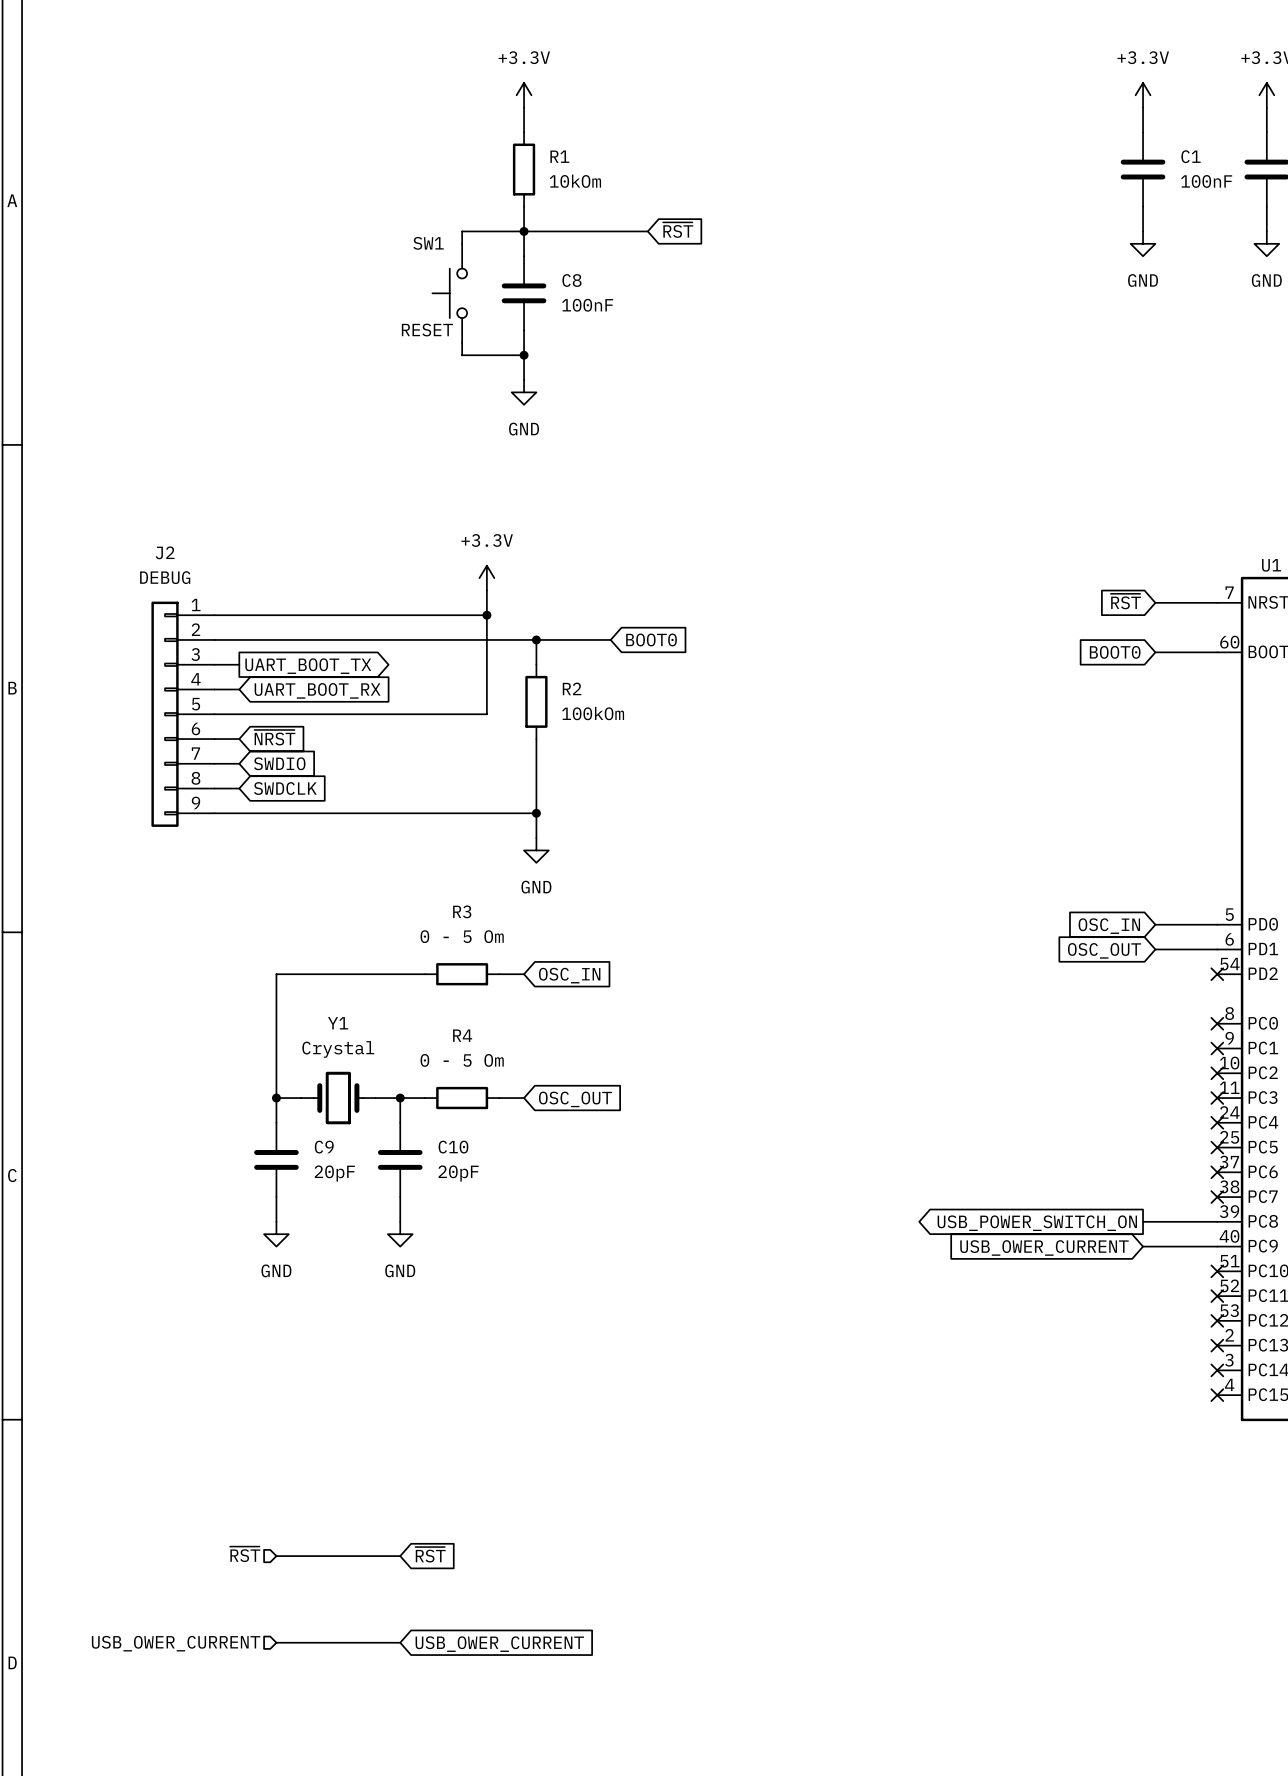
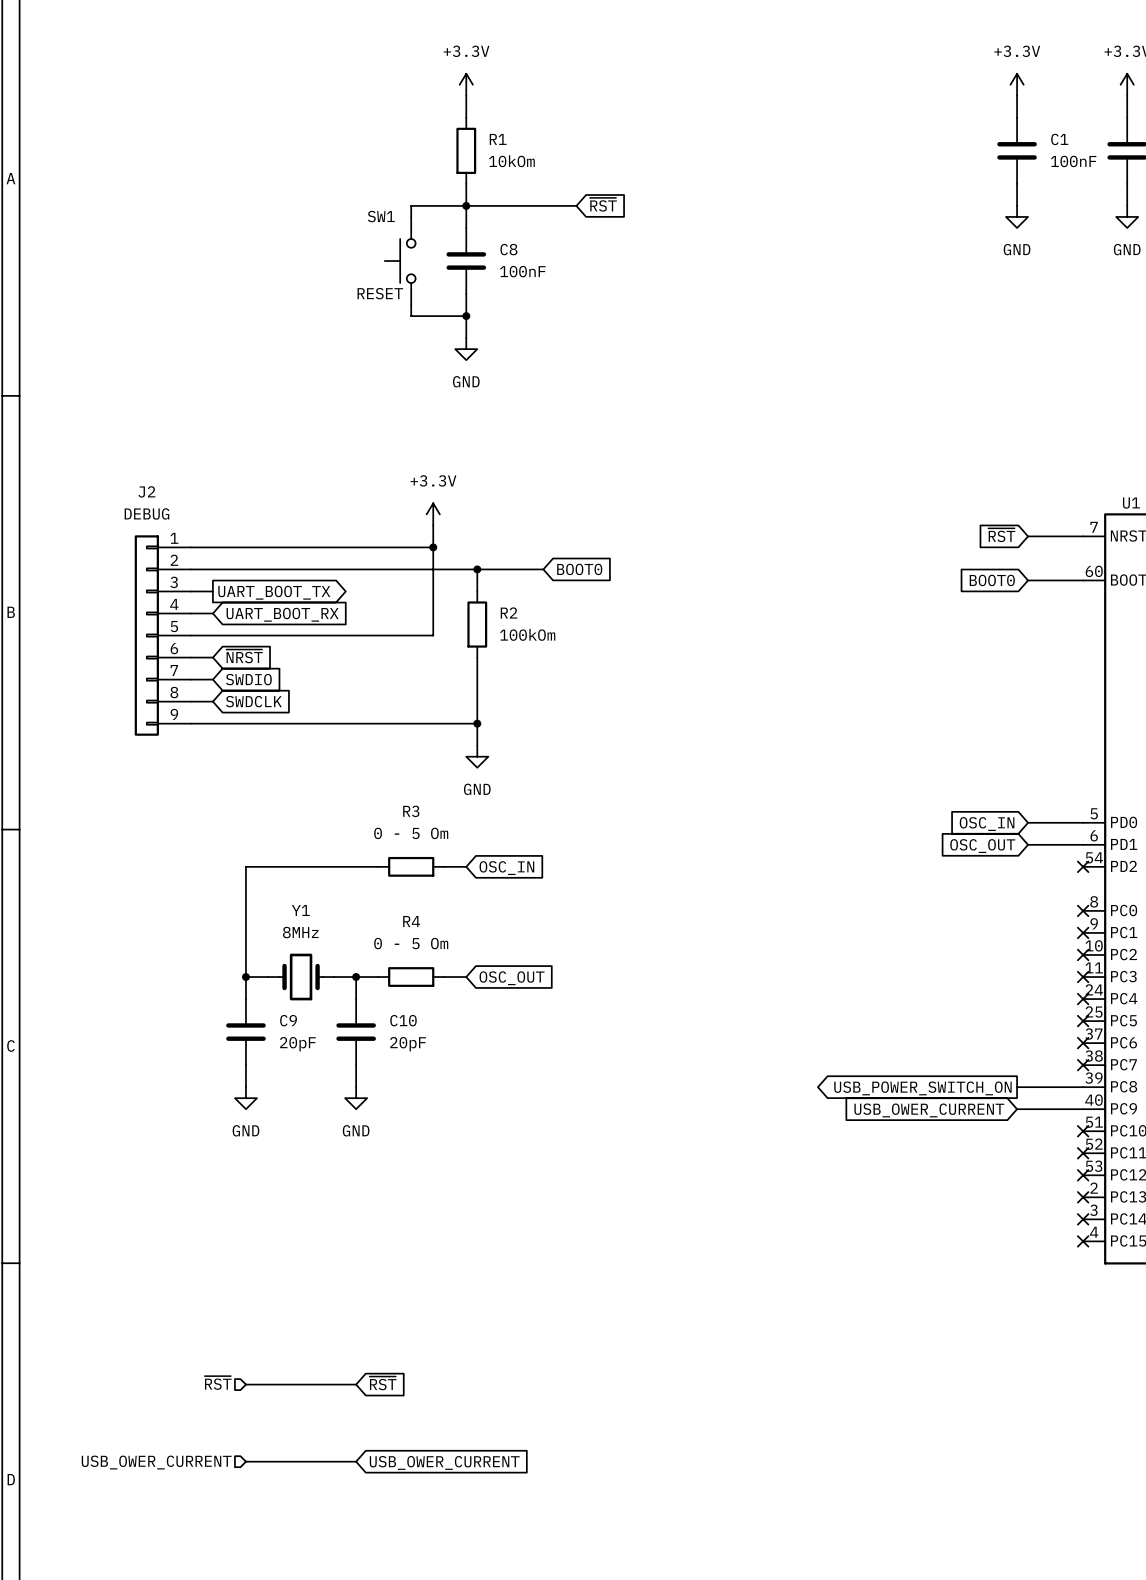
Y1 value: Crystal (338, 1049) -> 8MHz (300, 932)

